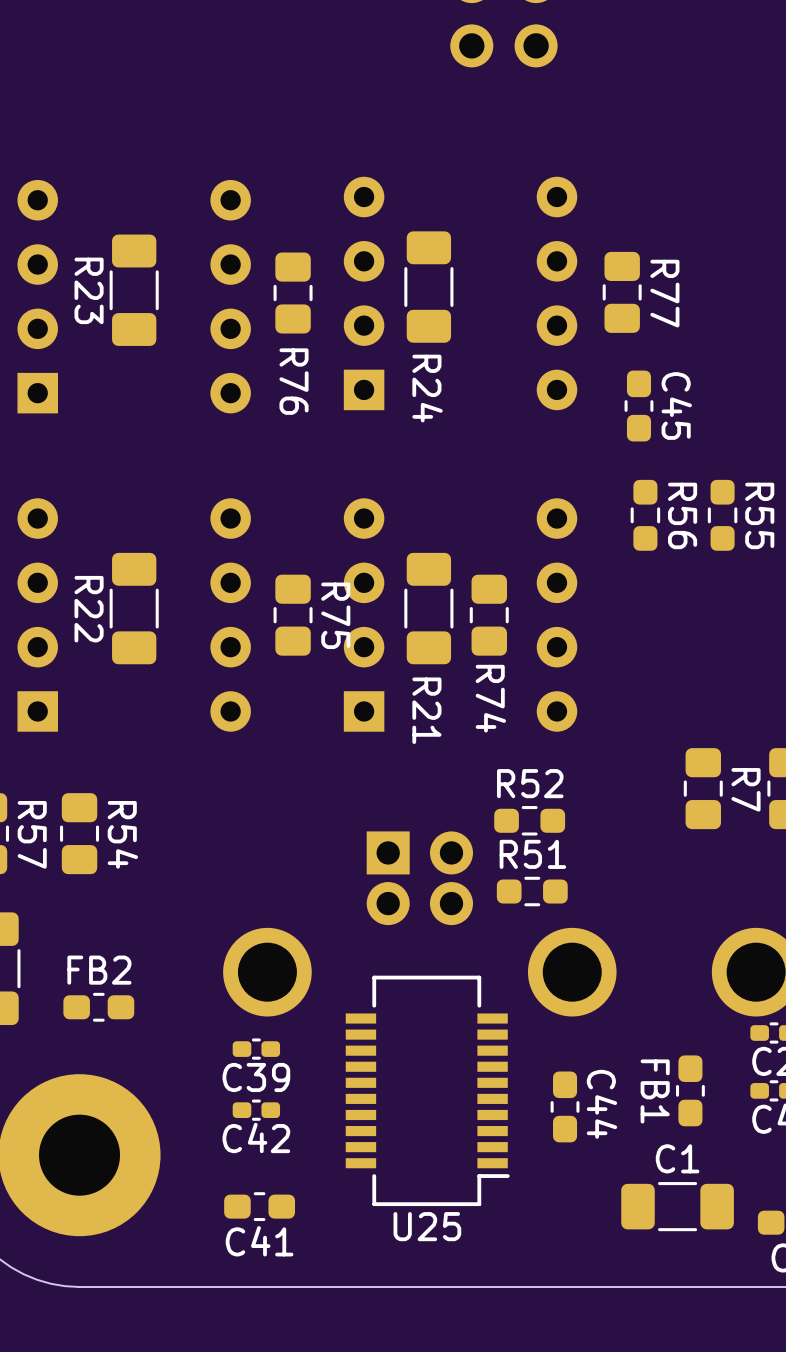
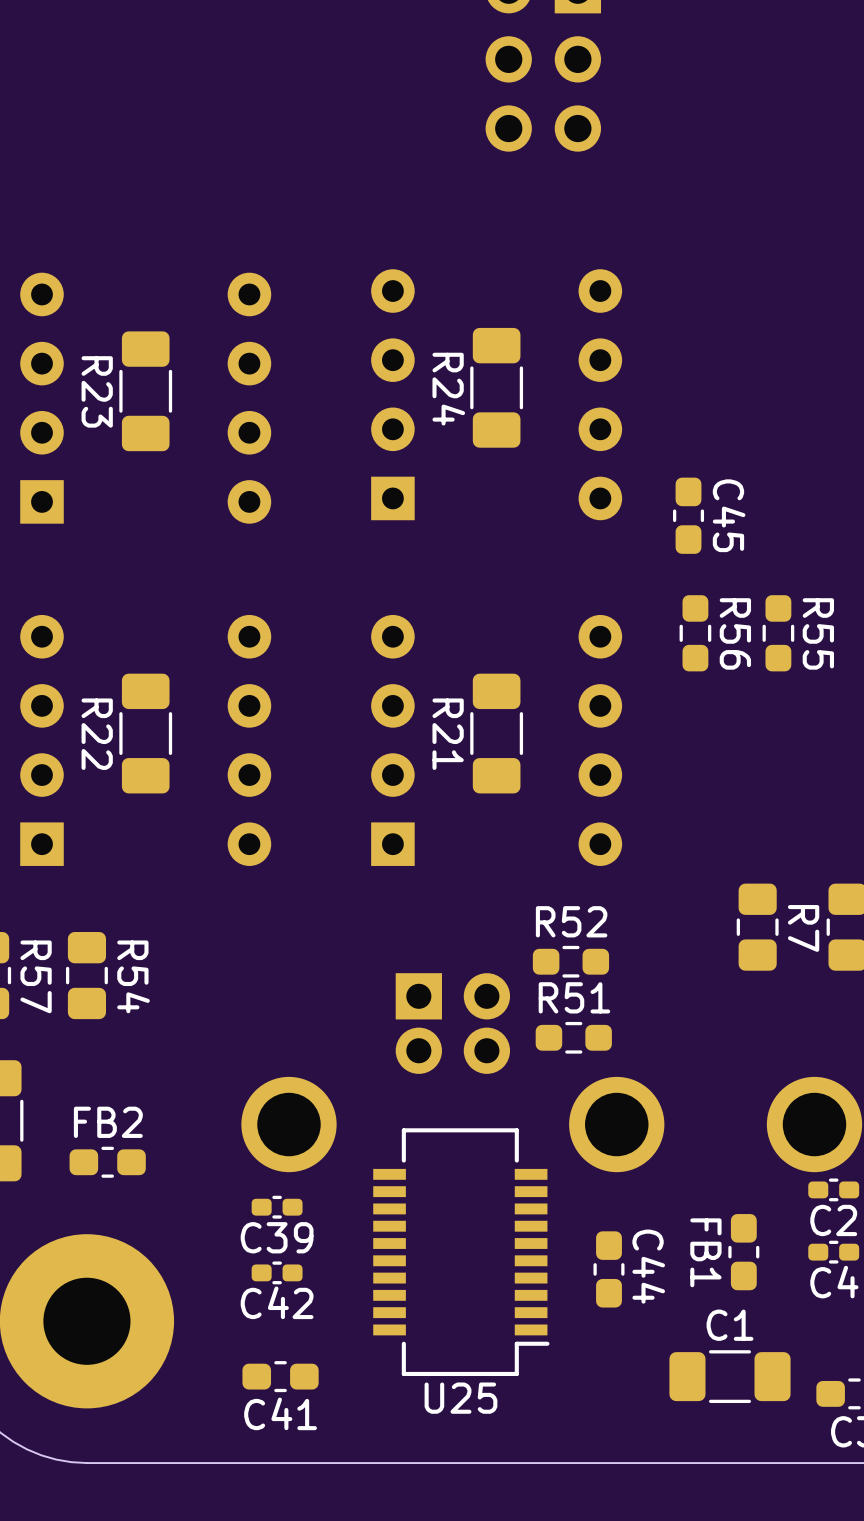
R24 position: (428, 287) -> (496, 387)
R77: (622, 292) -> none
R76: (293, 293) -> none
R24 name position: R24 (427, 388) -> R24 (448, 389)
R21 position: (428, 608) -> (496, 733)
R75: (293, 615) -> none
R74: (489, 615) -> none
R21 name position: R21 (426, 710) -> R21 (448, 734)

